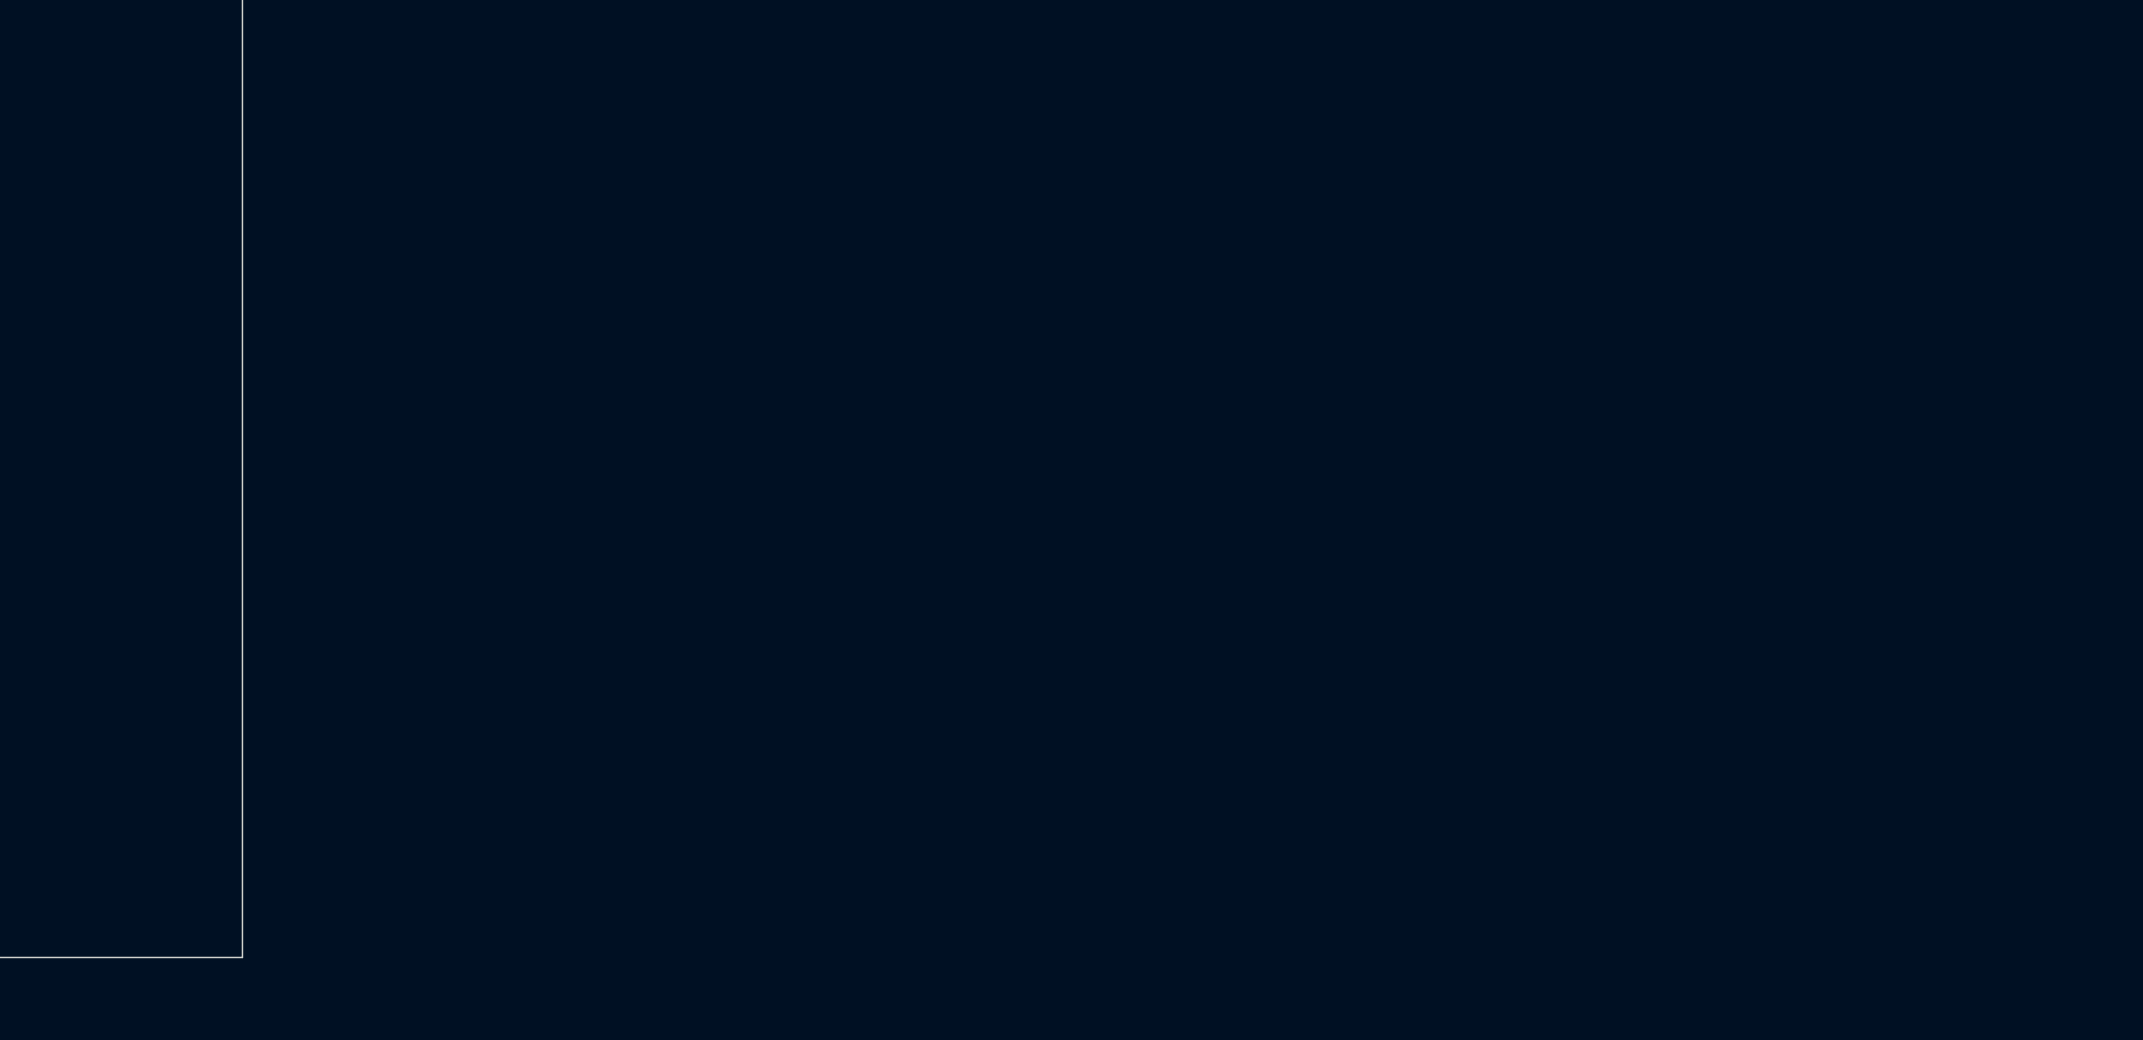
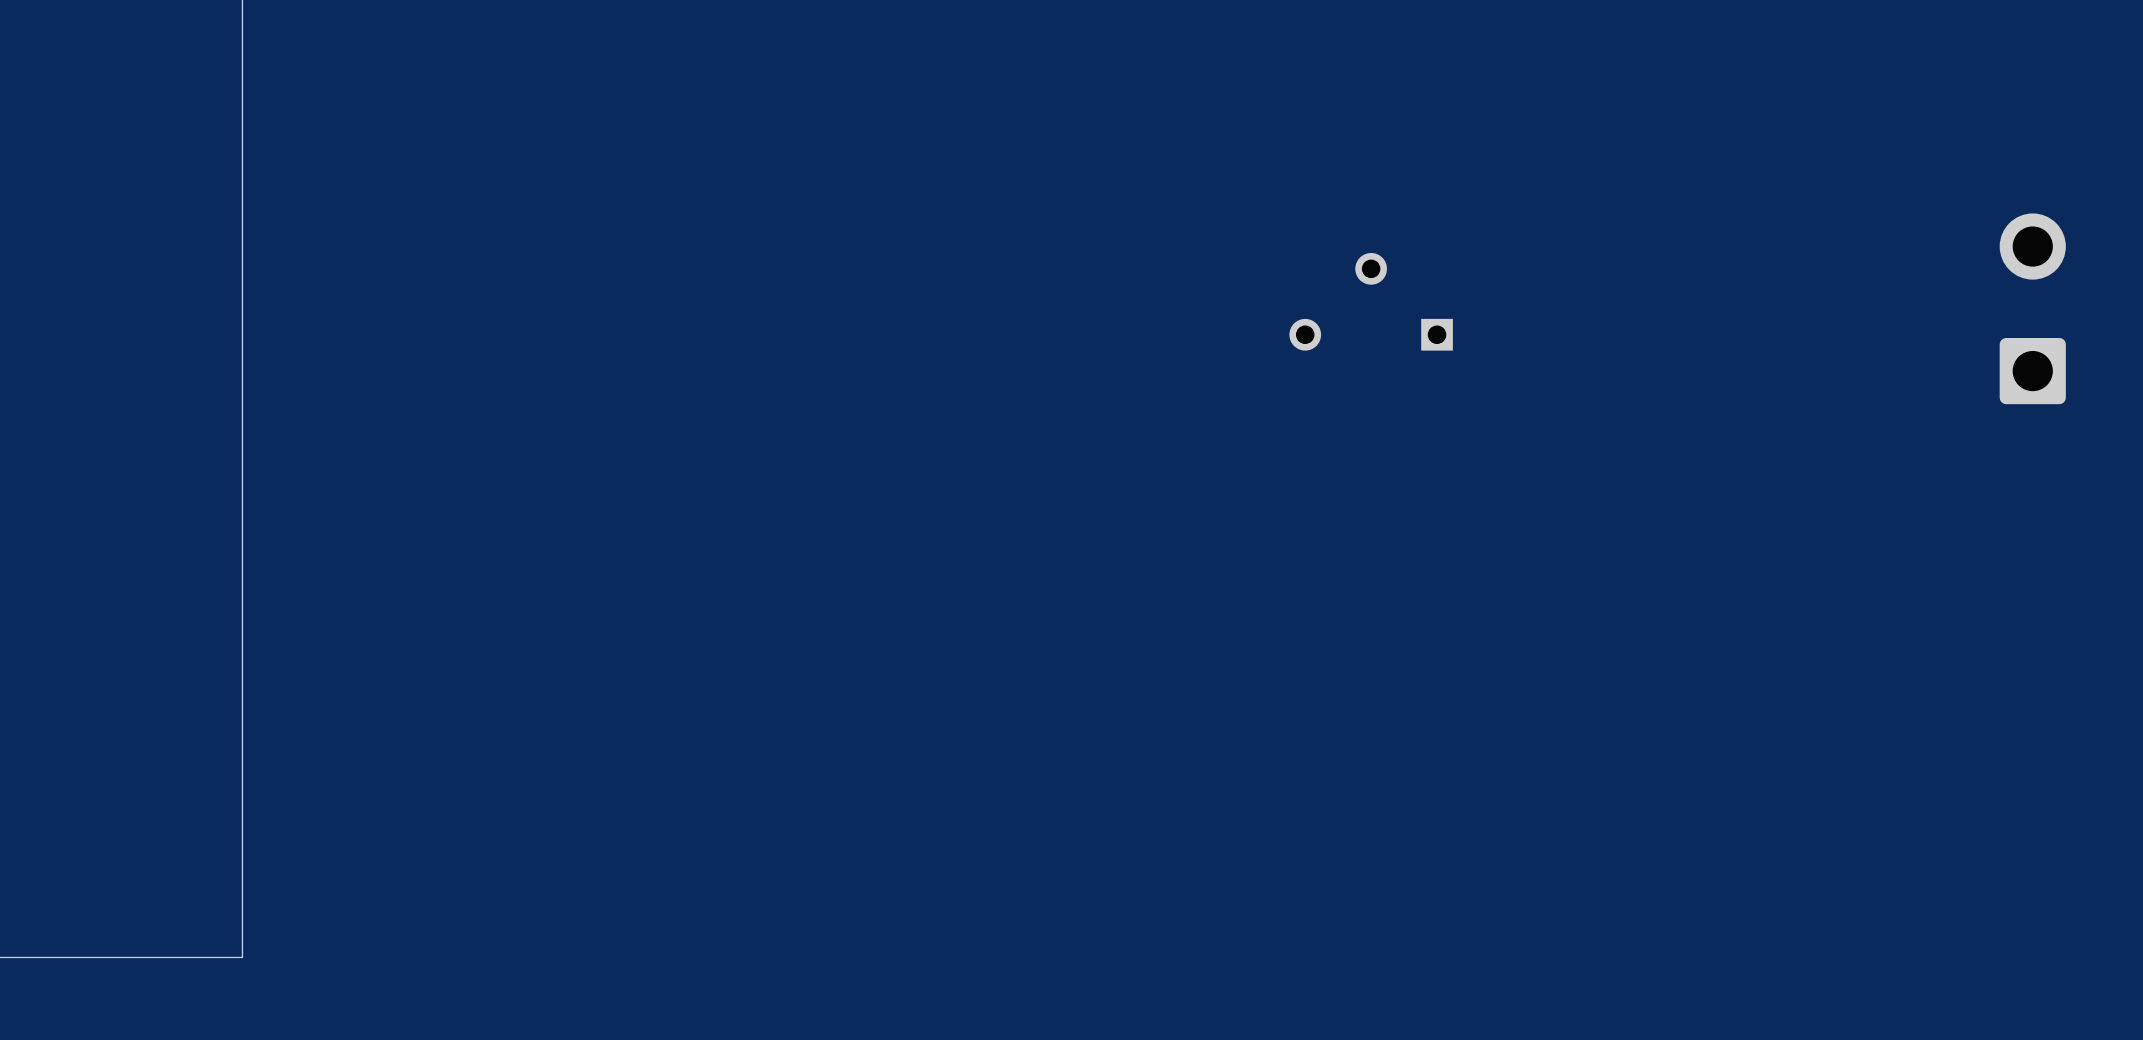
part: none -> (1371, 301)
part: none -> (2032, 308)

